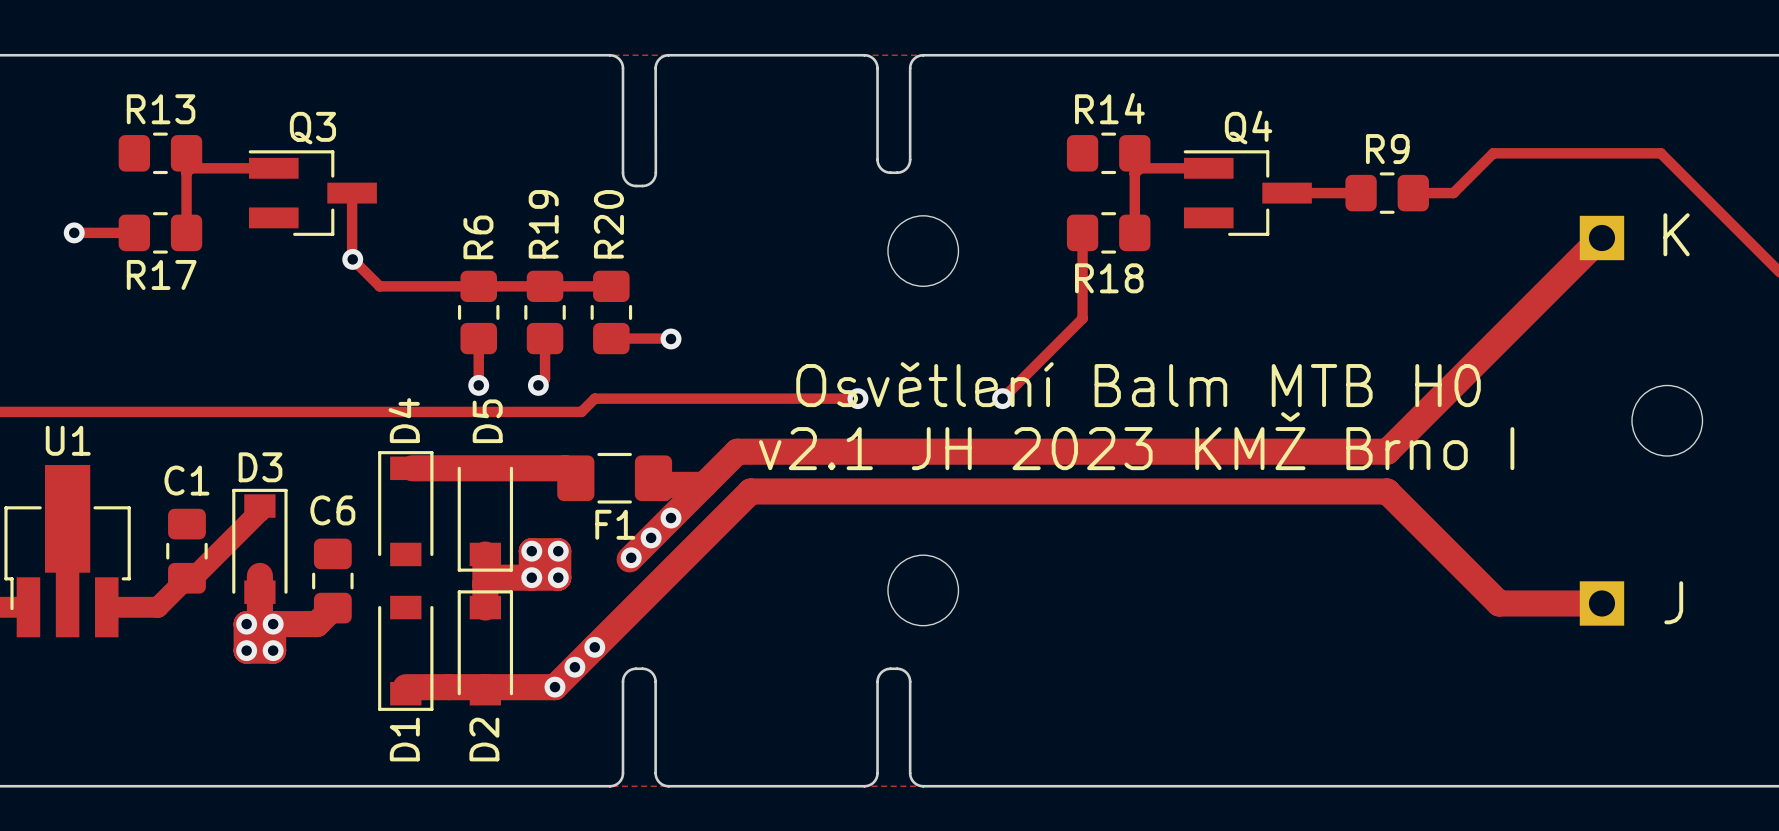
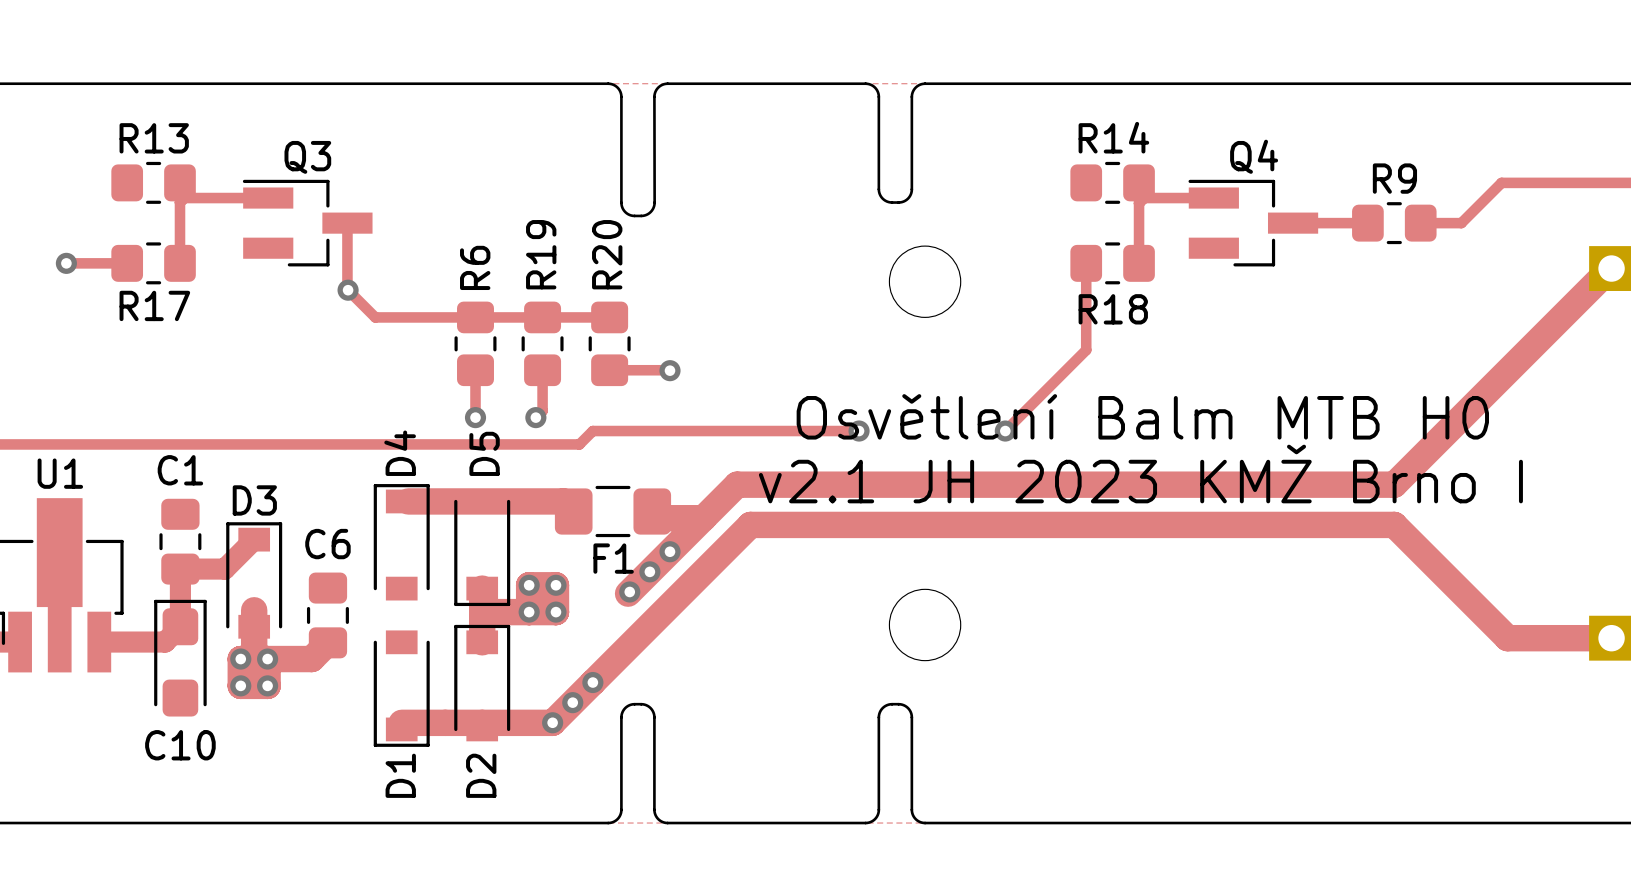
track: (259, 506) (259, 511) (193, 578) (186, 578) (157, 607) -> (254, 539) (224, 569) (180, 569) (180, 626) (165, 642) (151, 642)
C1 position: (186, 551) -> (180, 541)
C10: none -> (180, 658)

